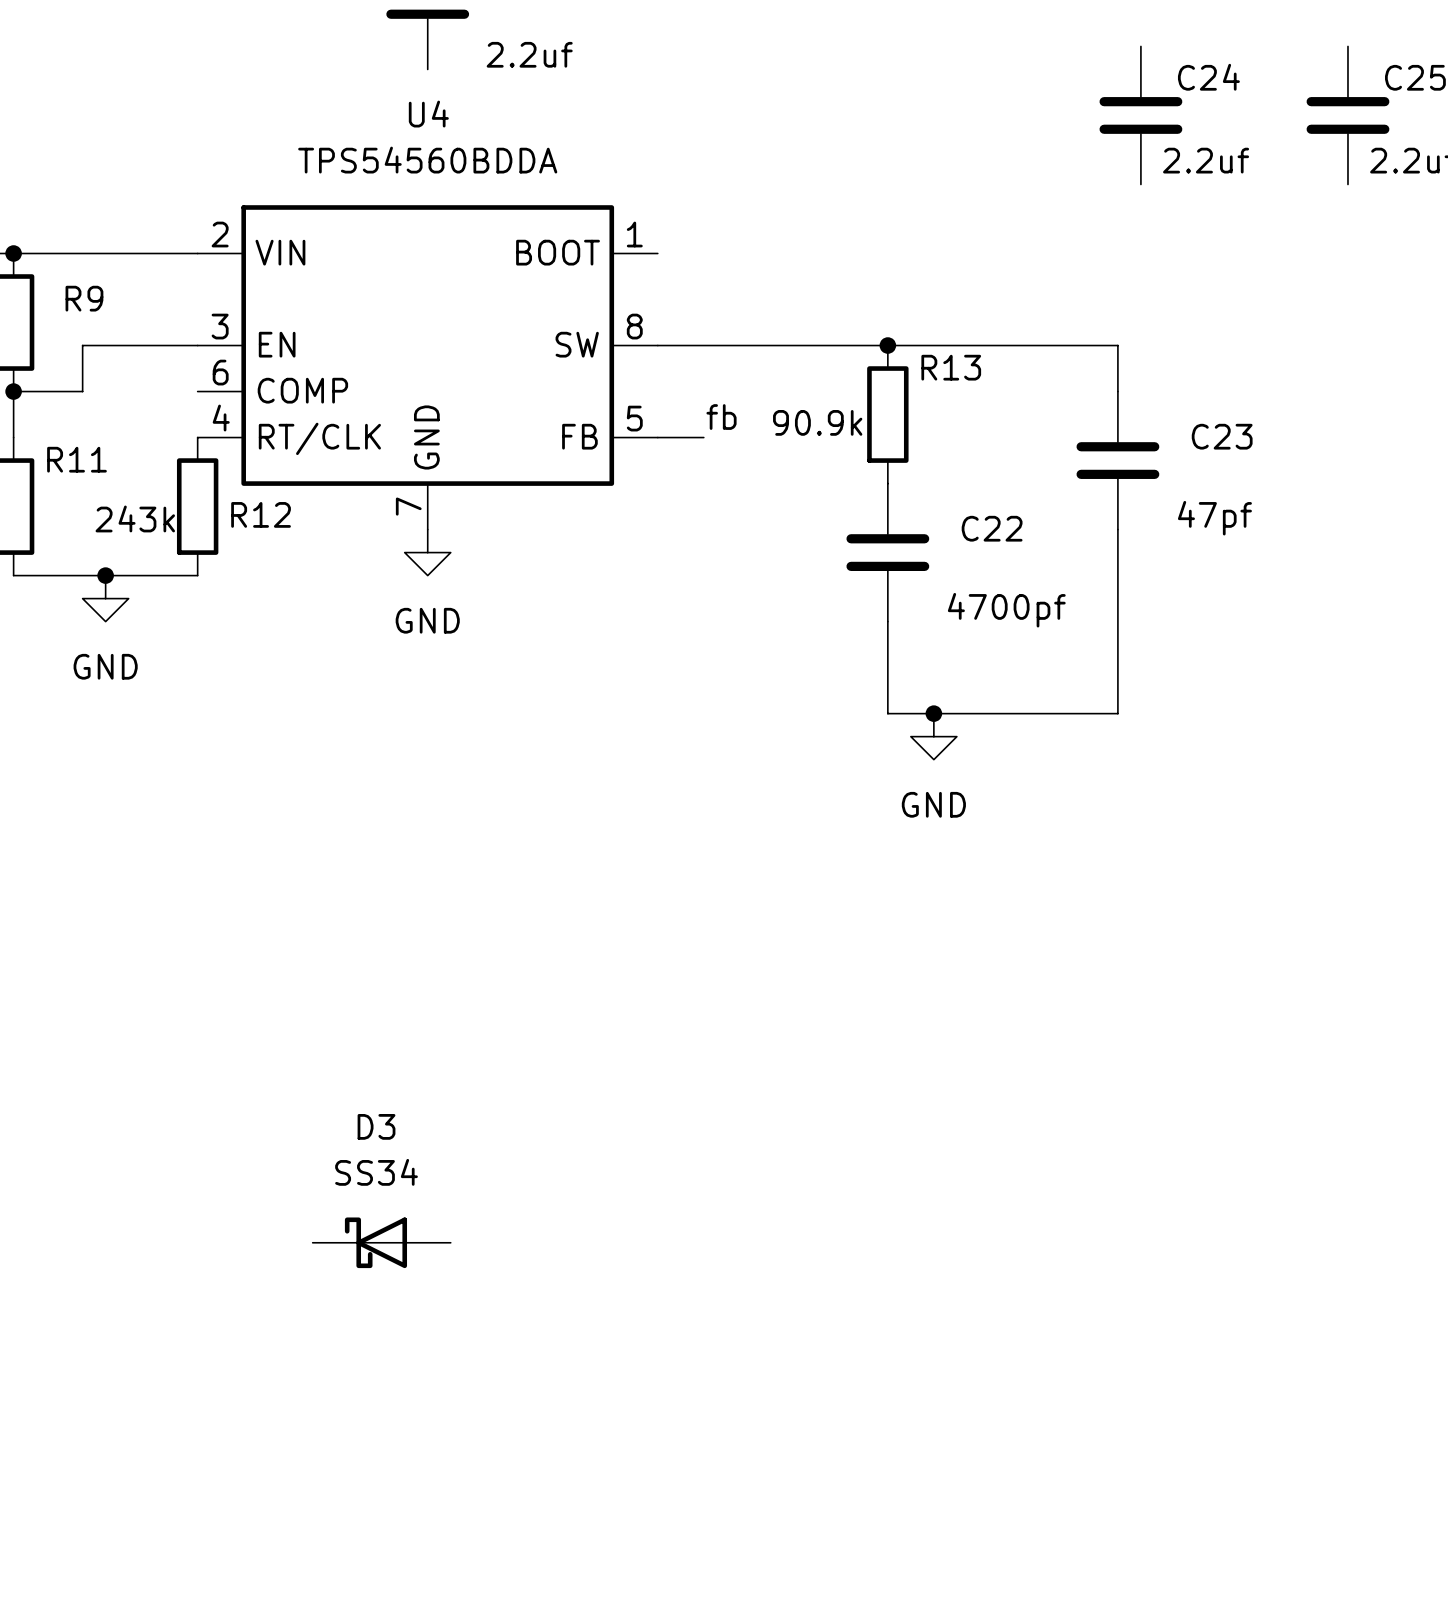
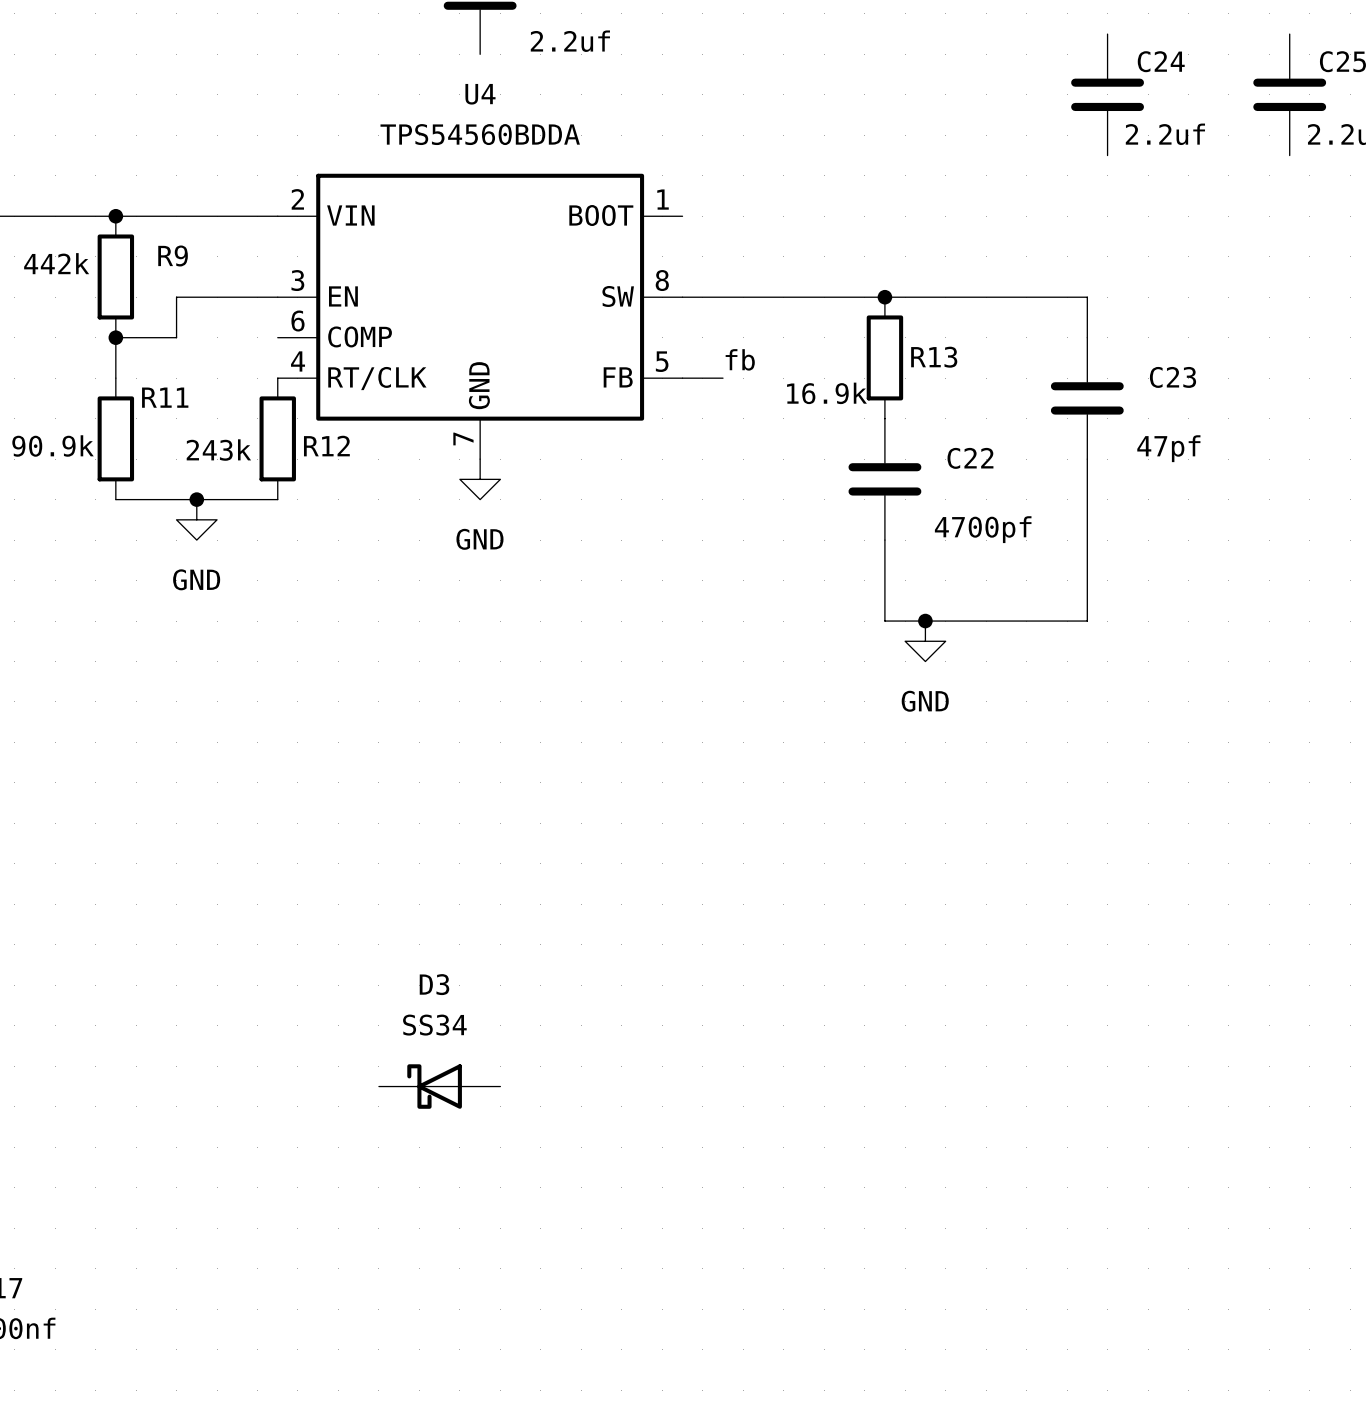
R13 name position: R13 (951, 367) -> R13 (934, 357)
R13 value: 90.9k (817, 422) -> 16.9k (826, 393)

